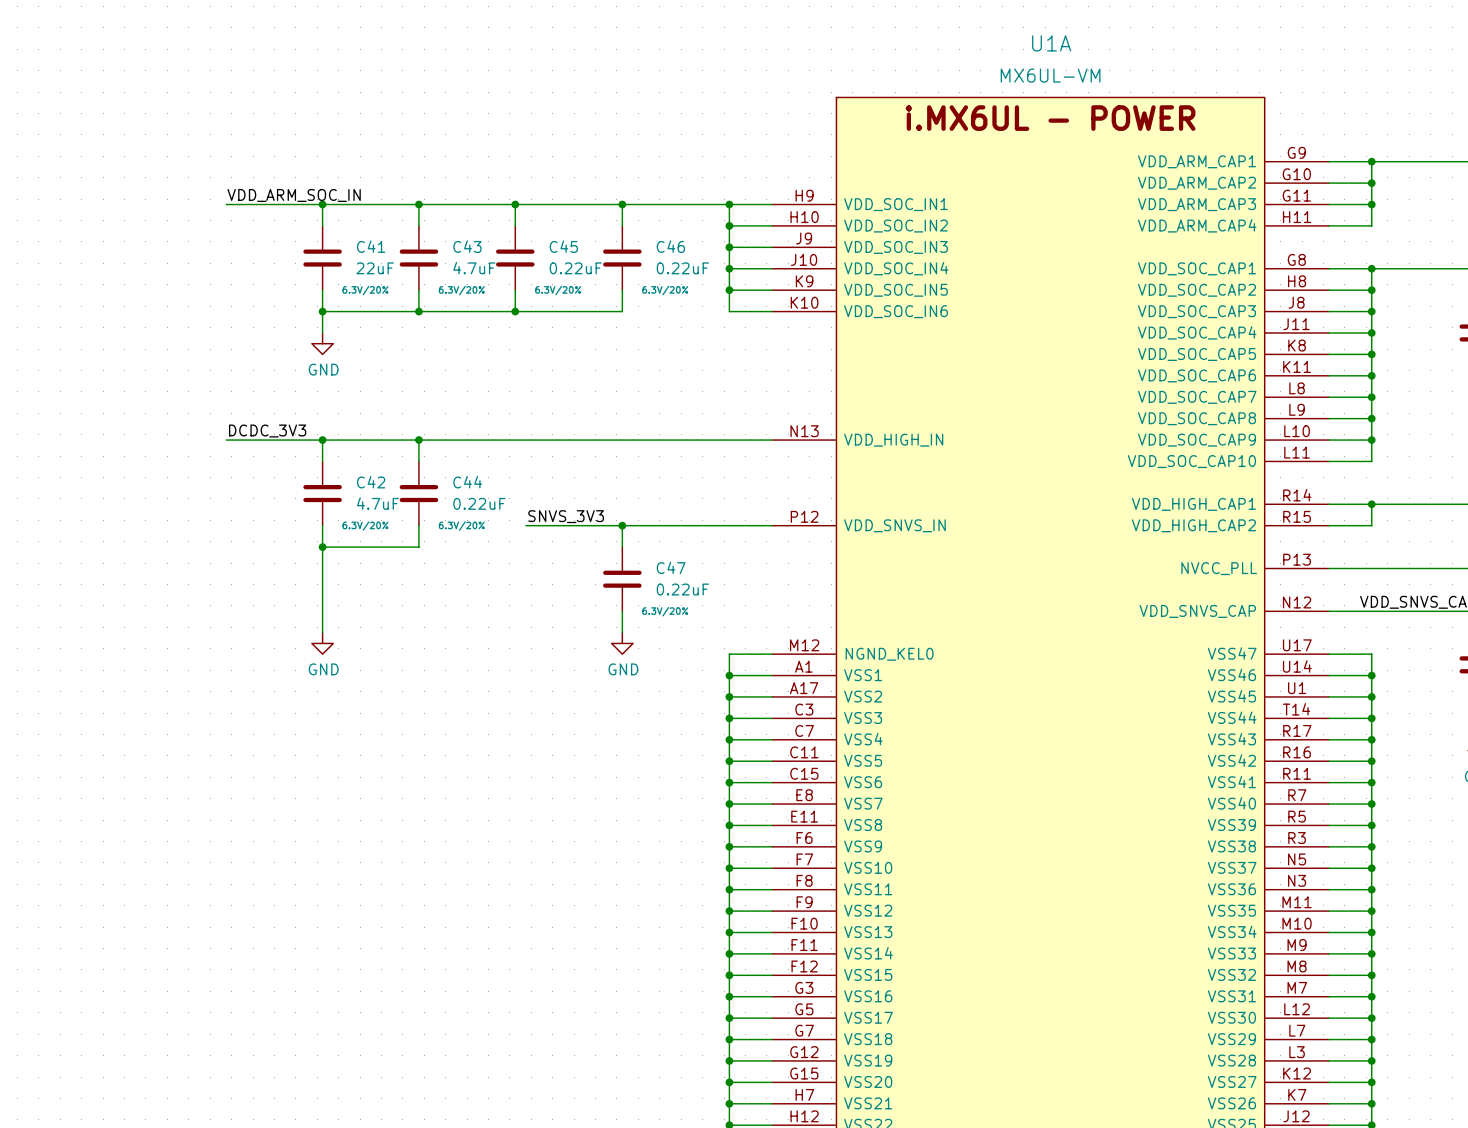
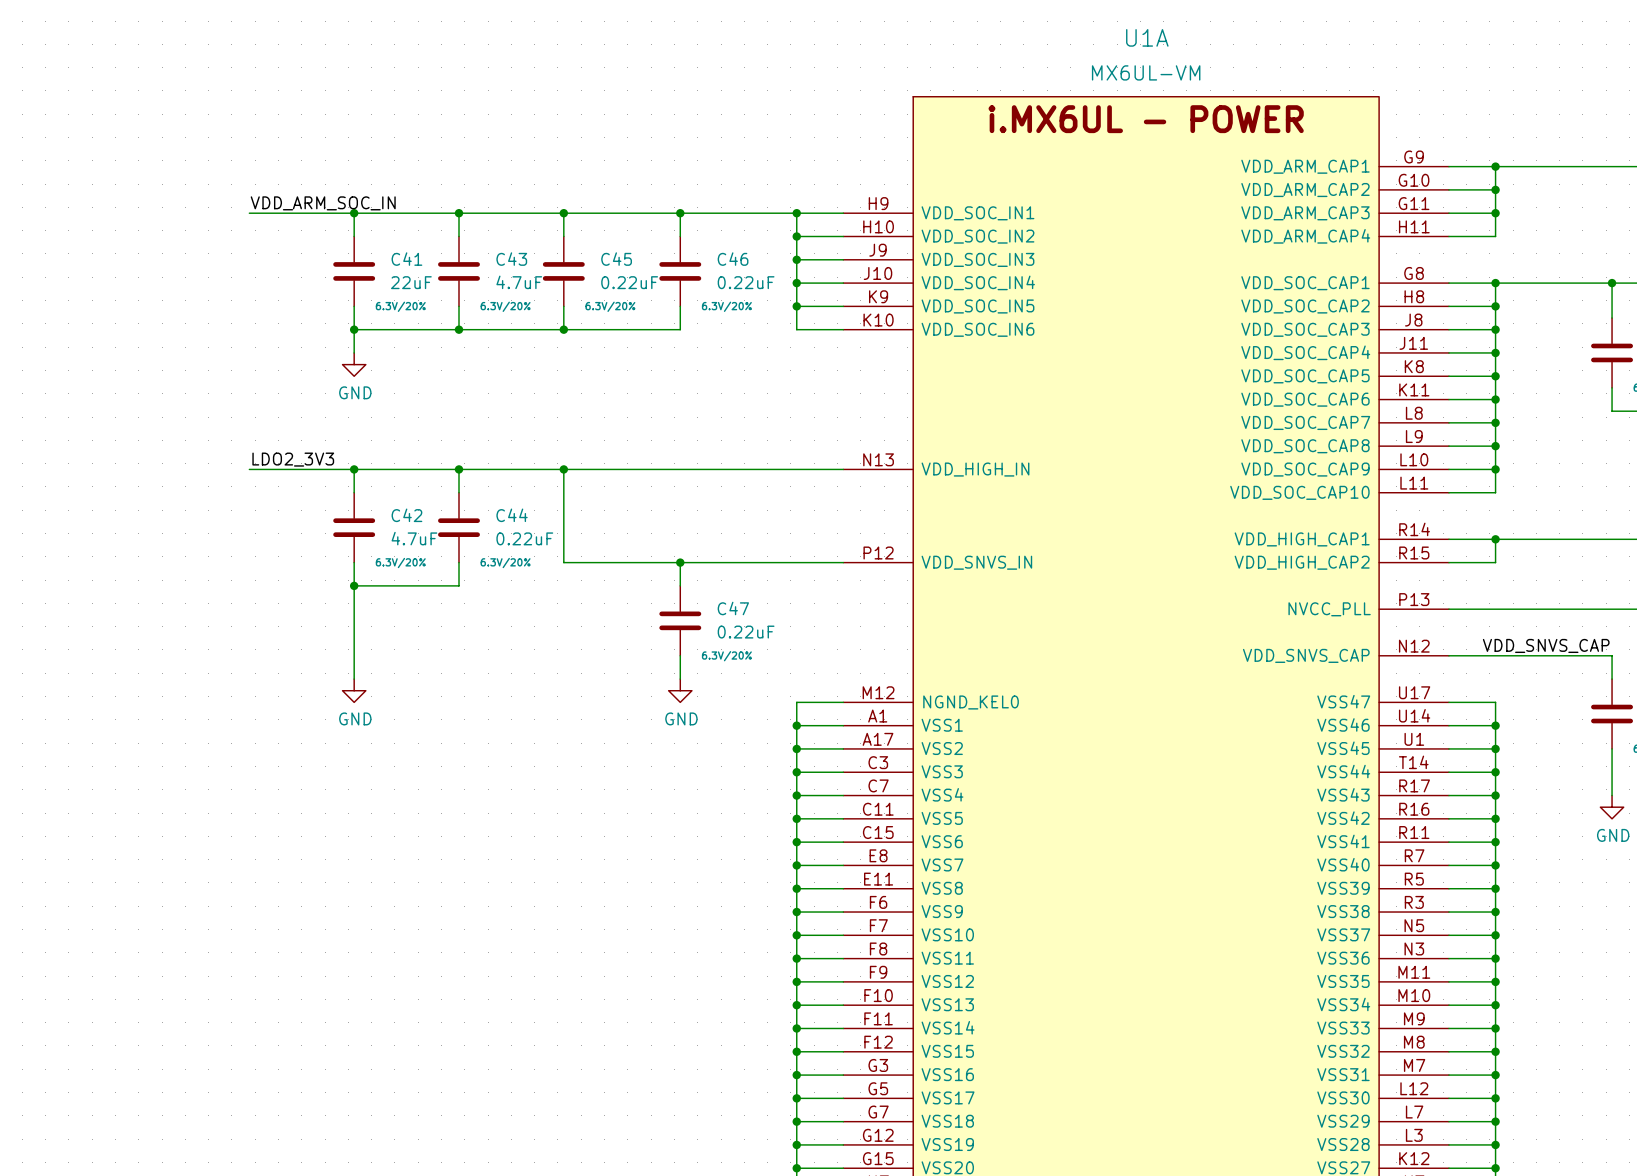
label: DCDC_3V3 (267, 430) -> LDO2_3V3 (293, 459)
wire: none -> (563, 469) (563, 562) (575, 562)
junction: none -> (563, 469)
label: SNVS_3V3 (566, 516) -> none

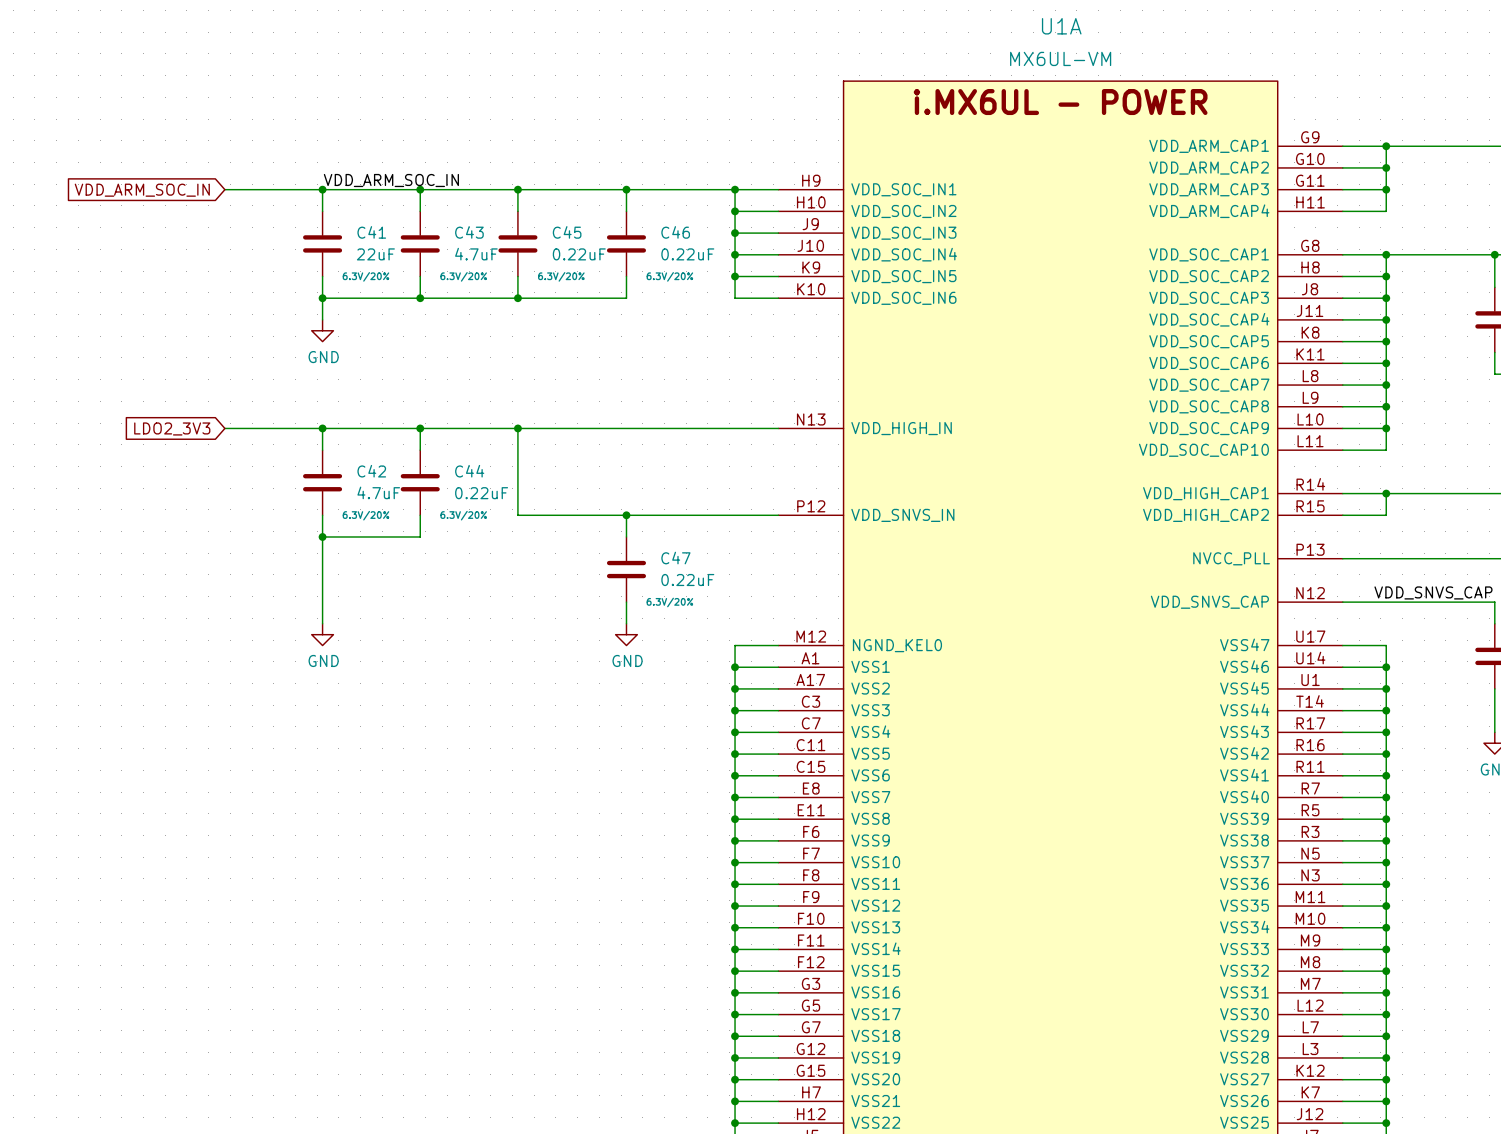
label position: VDD_ARM_SOC_IN (323, 203) -> VDD_ARM_SOC_IN (391, 180)
global label: none -> VDD_ARM_SOC_IN (142, 190)
label: LDO2_3V3 (293, 459) -> none
global label: none -> LDO2_3V3 (172, 428)

